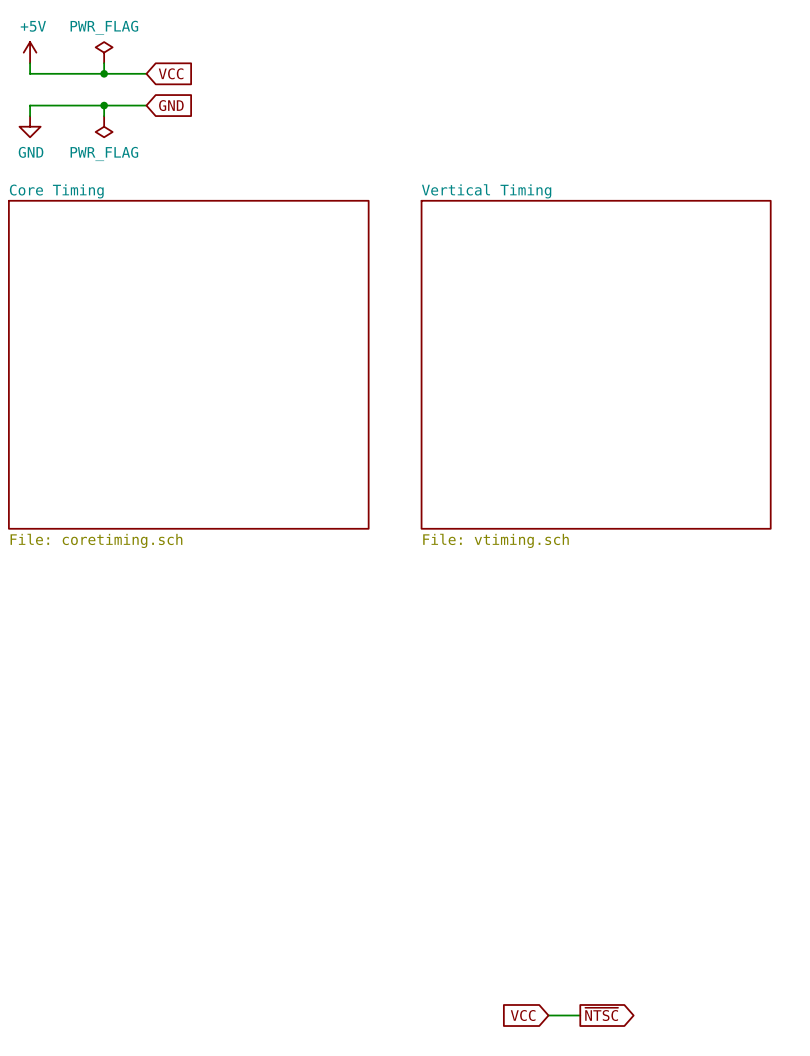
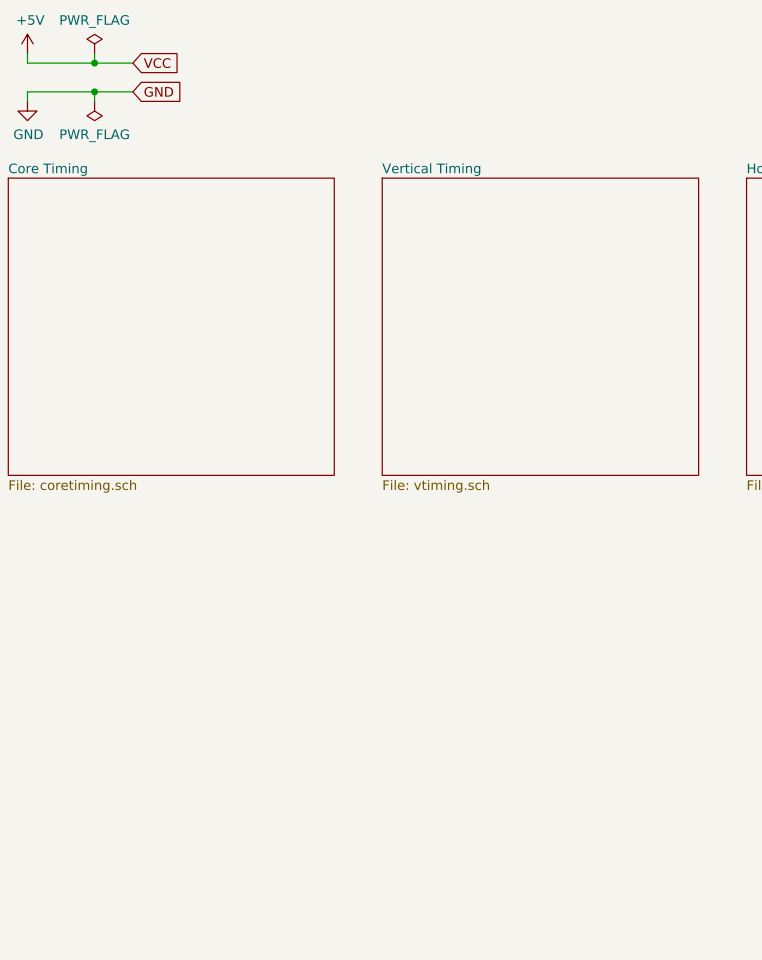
global label: ~{NTSC} (601, 1014) -> none
global label: VCC (523, 1015) -> none
wire: (548, 1015) (580, 1015) -> none

